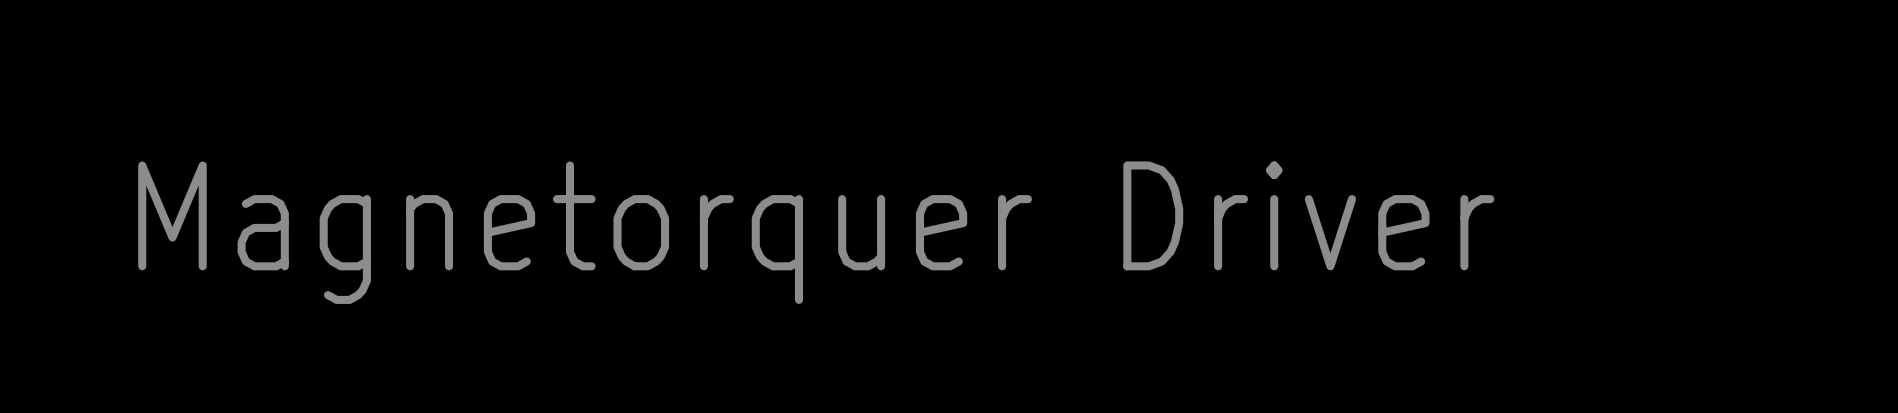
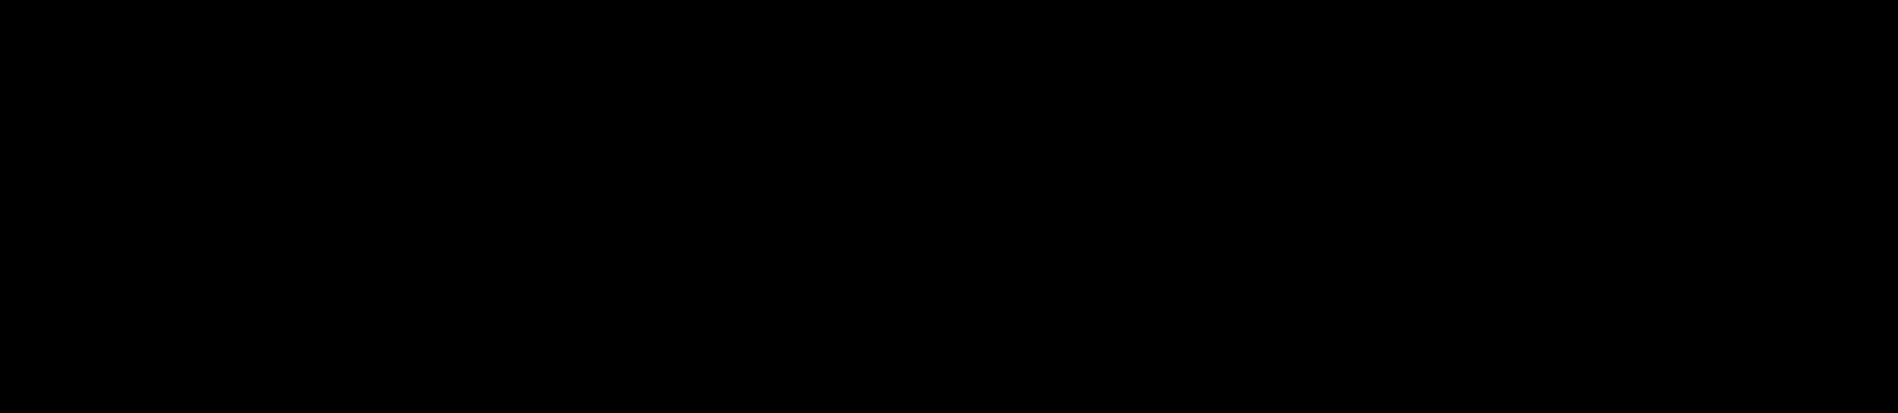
text: Magnetorquer Driver (816, 232) -> none

